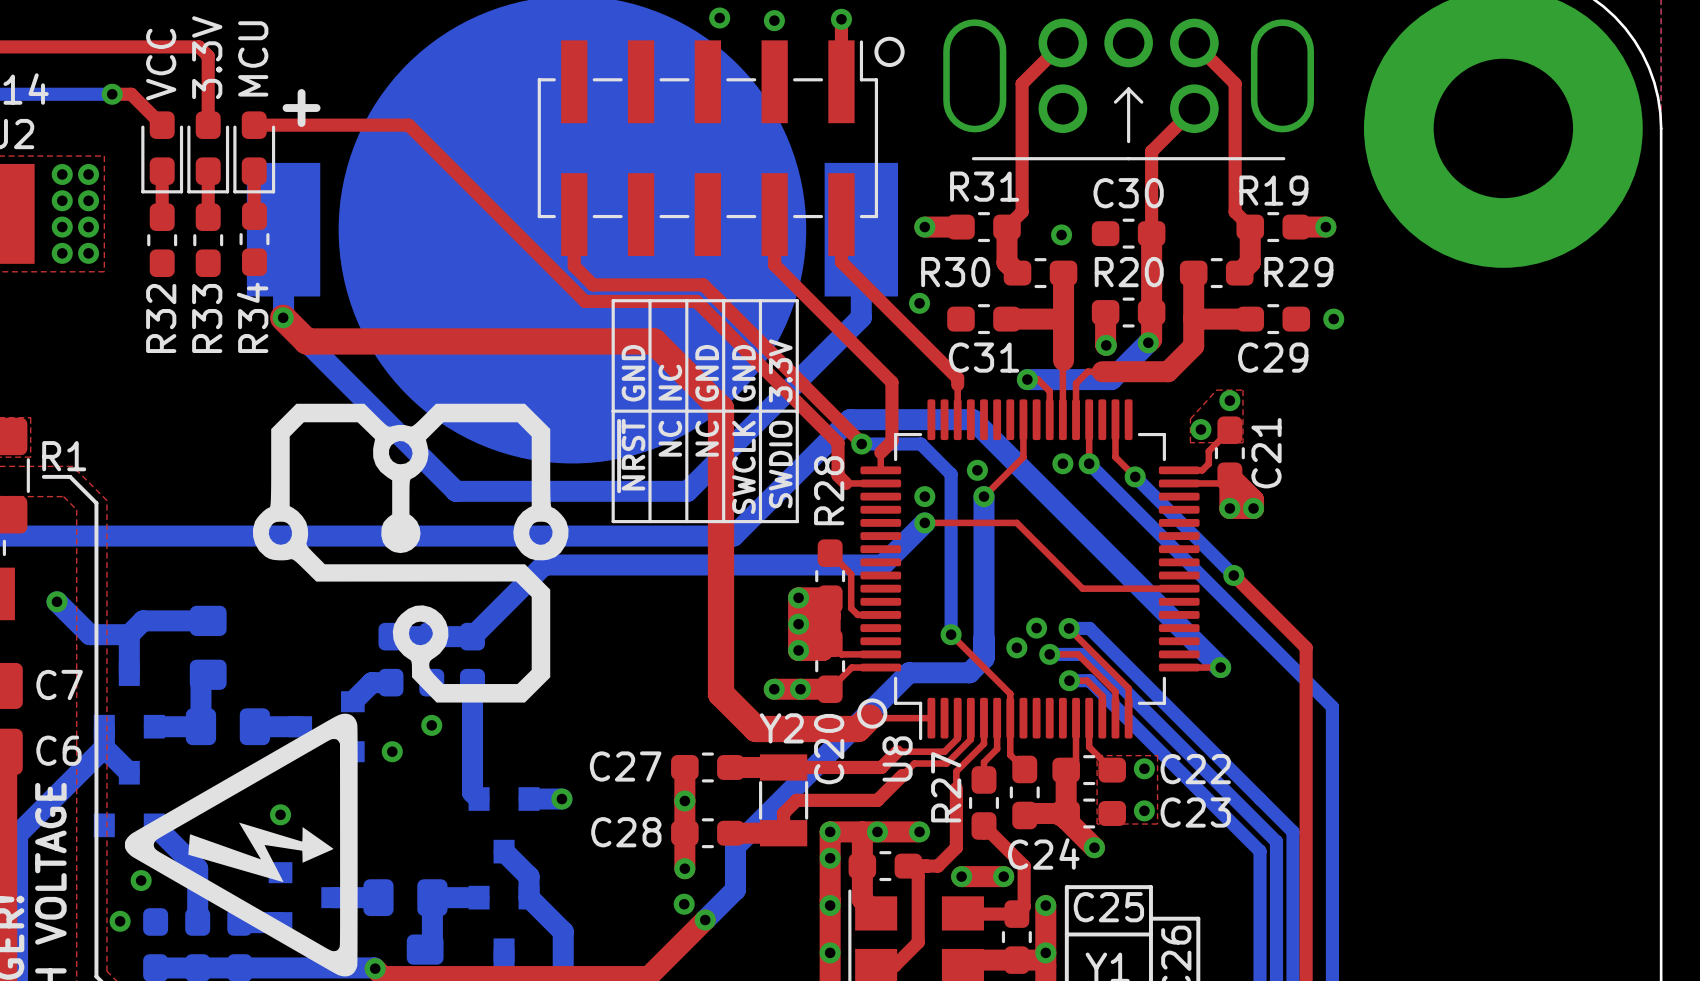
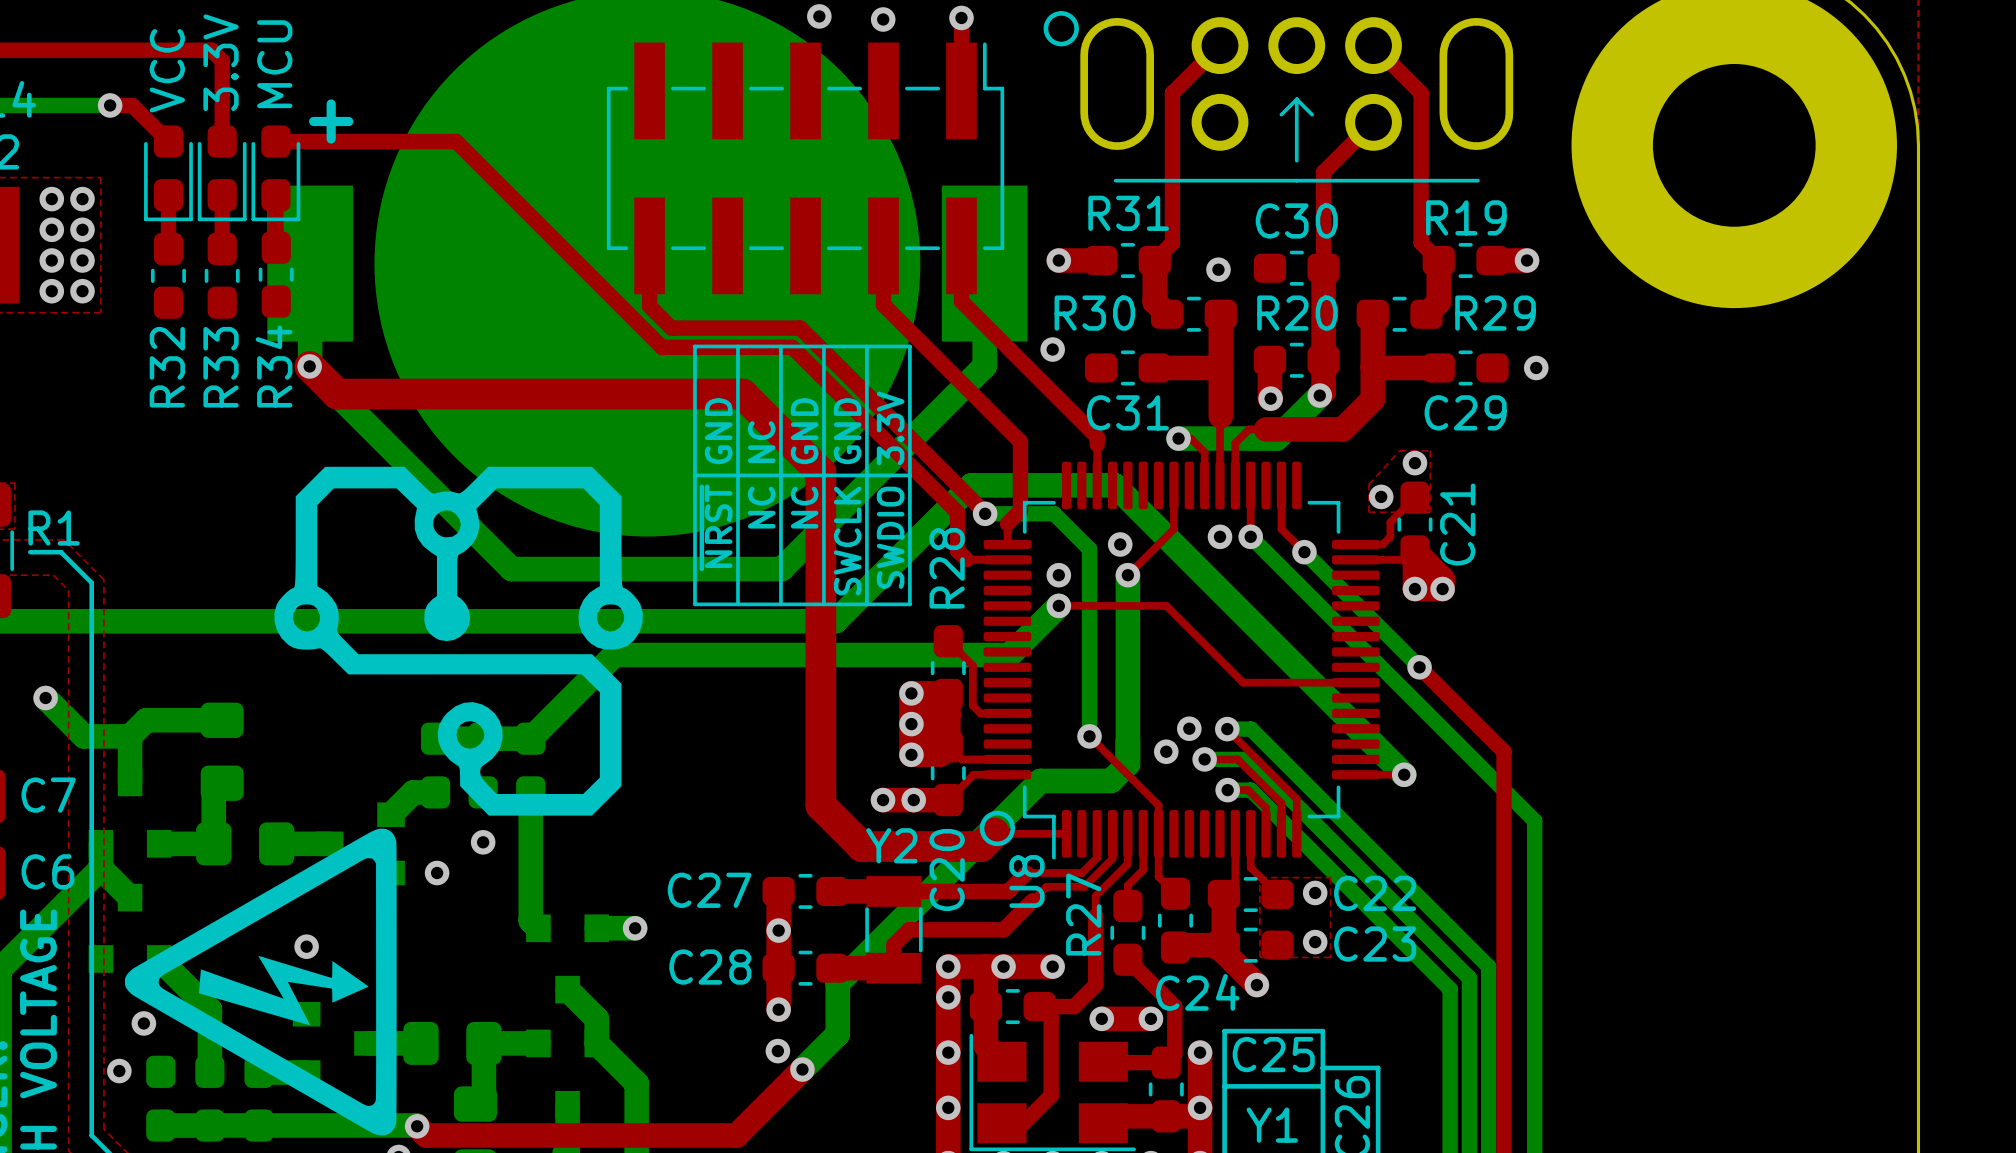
drawing position: (889, 51) -> (1061, 28)

